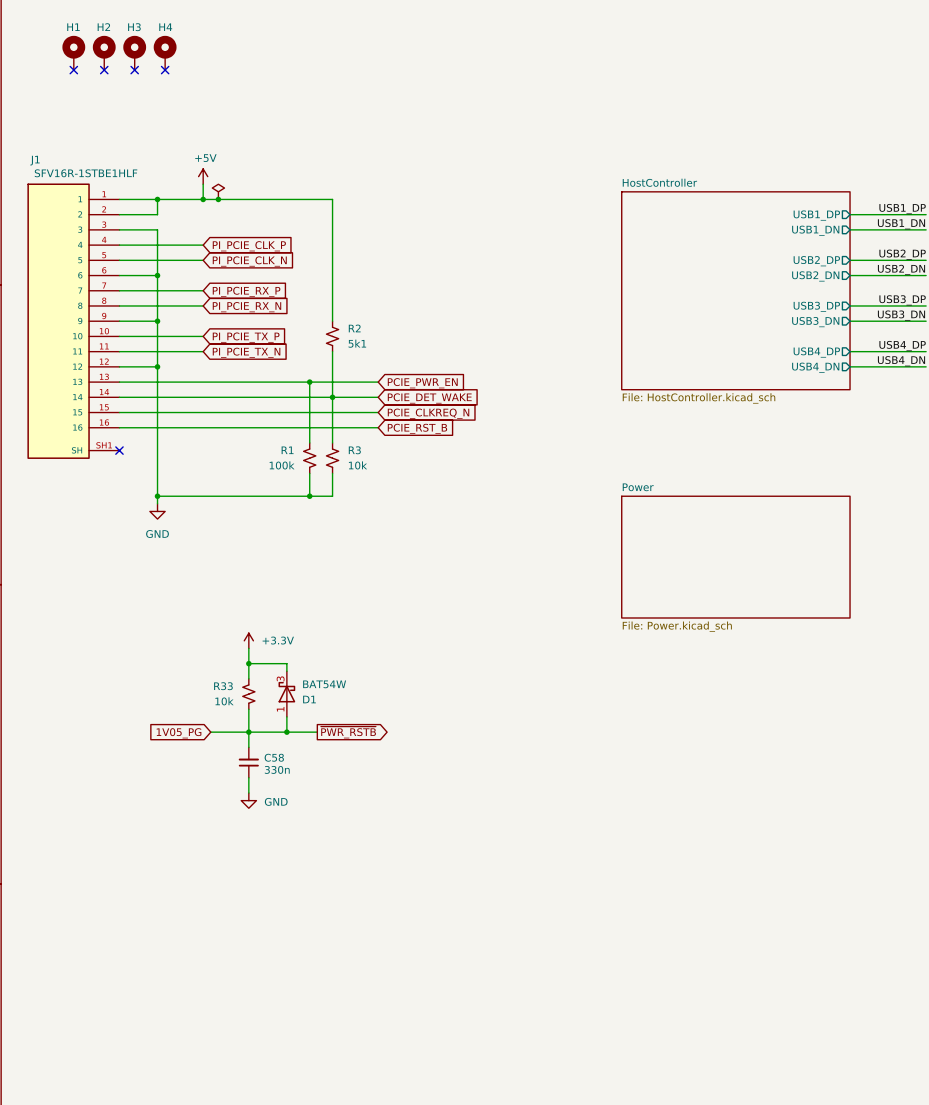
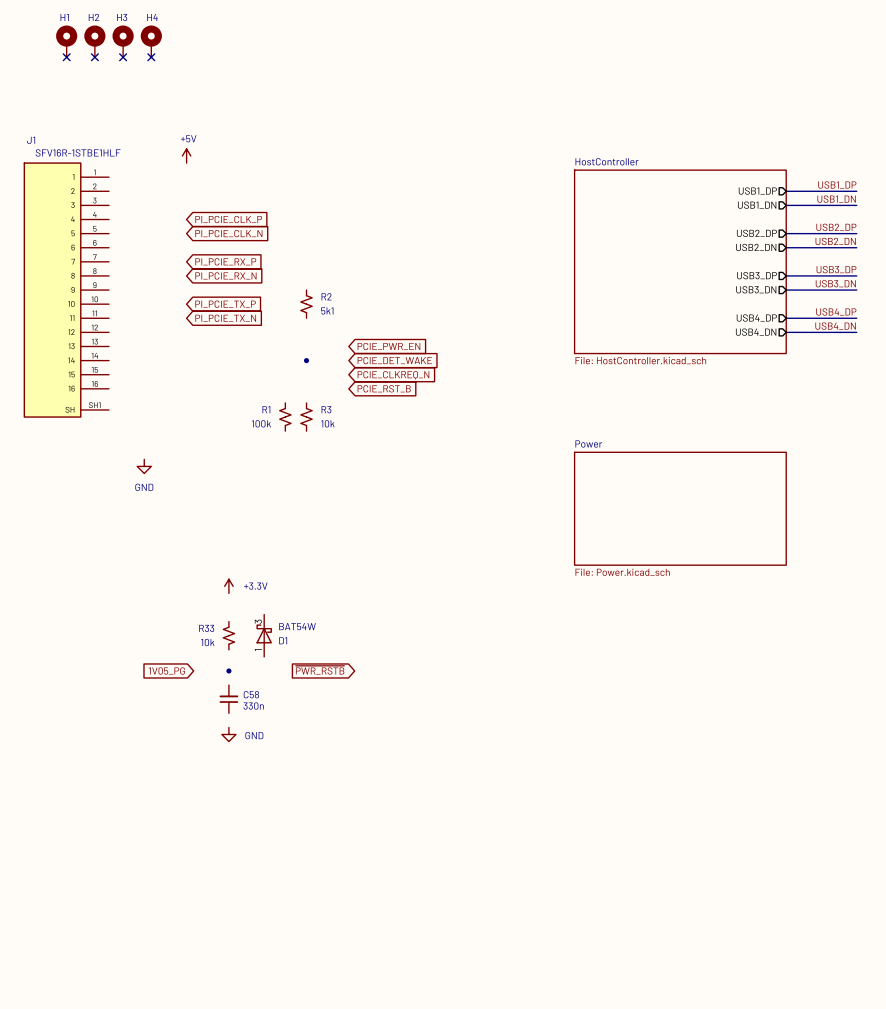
wire: (203, 184) (203, 199) -> none
power symbol: (218, 191) -> none
wire: (119, 199) (332, 199) (332, 321) -> none
wire: (157, 199) (157, 214) (119, 214) -> none
junction: (157, 199) -> none
junction: (203, 199) -> none
junction: (218, 199) -> none
wire: (119, 229) (157, 229) (157, 503) -> none
wire: (119, 245) (203, 245) -> none
wire: (119, 260) (203, 260) -> none
wire: (119, 275) (157, 275) -> none
junction: (157, 275) -> none
wire: (119, 290) (203, 290) -> none
wire: (119, 305) (203, 305) -> none
wire: (119, 321) (157, 321) -> none
junction: (157, 321) -> none
wire: (119, 336) (203, 336) -> none
wire: (119, 351) (203, 351) -> none
wire: (332, 351) (332, 442) -> none
wire: (119, 366) (157, 366) -> none
junction: (157, 366) -> none
wire: (119, 382) (378, 382) -> none
wire: (309, 382) (309, 442) -> none
junction: (309, 382) -> none
wire: (119, 397) (378, 397) -> none
wire: (119, 412) (378, 412) -> none
wire: (119, 427) (378, 427) -> none
no-connect mark: (119, 450) -> none
wire: (309, 473) (309, 496) -> none
wire: (332, 473) (332, 496) (157, 496) -> none
junction: (157, 496) -> none
junction: (309, 496) -> none
wire: (248, 648) (248, 678) -> none
wire: (248, 663) (286, 663) (286, 671) -> none
junction: (248, 663) -> none
wire: (248, 709) (248, 747) -> none
wire: (286, 716) (286, 732) -> none
wire: (210, 732) (317, 732) -> none
junction: (286, 732) -> none
wire: (248, 777) (248, 793) -> none

